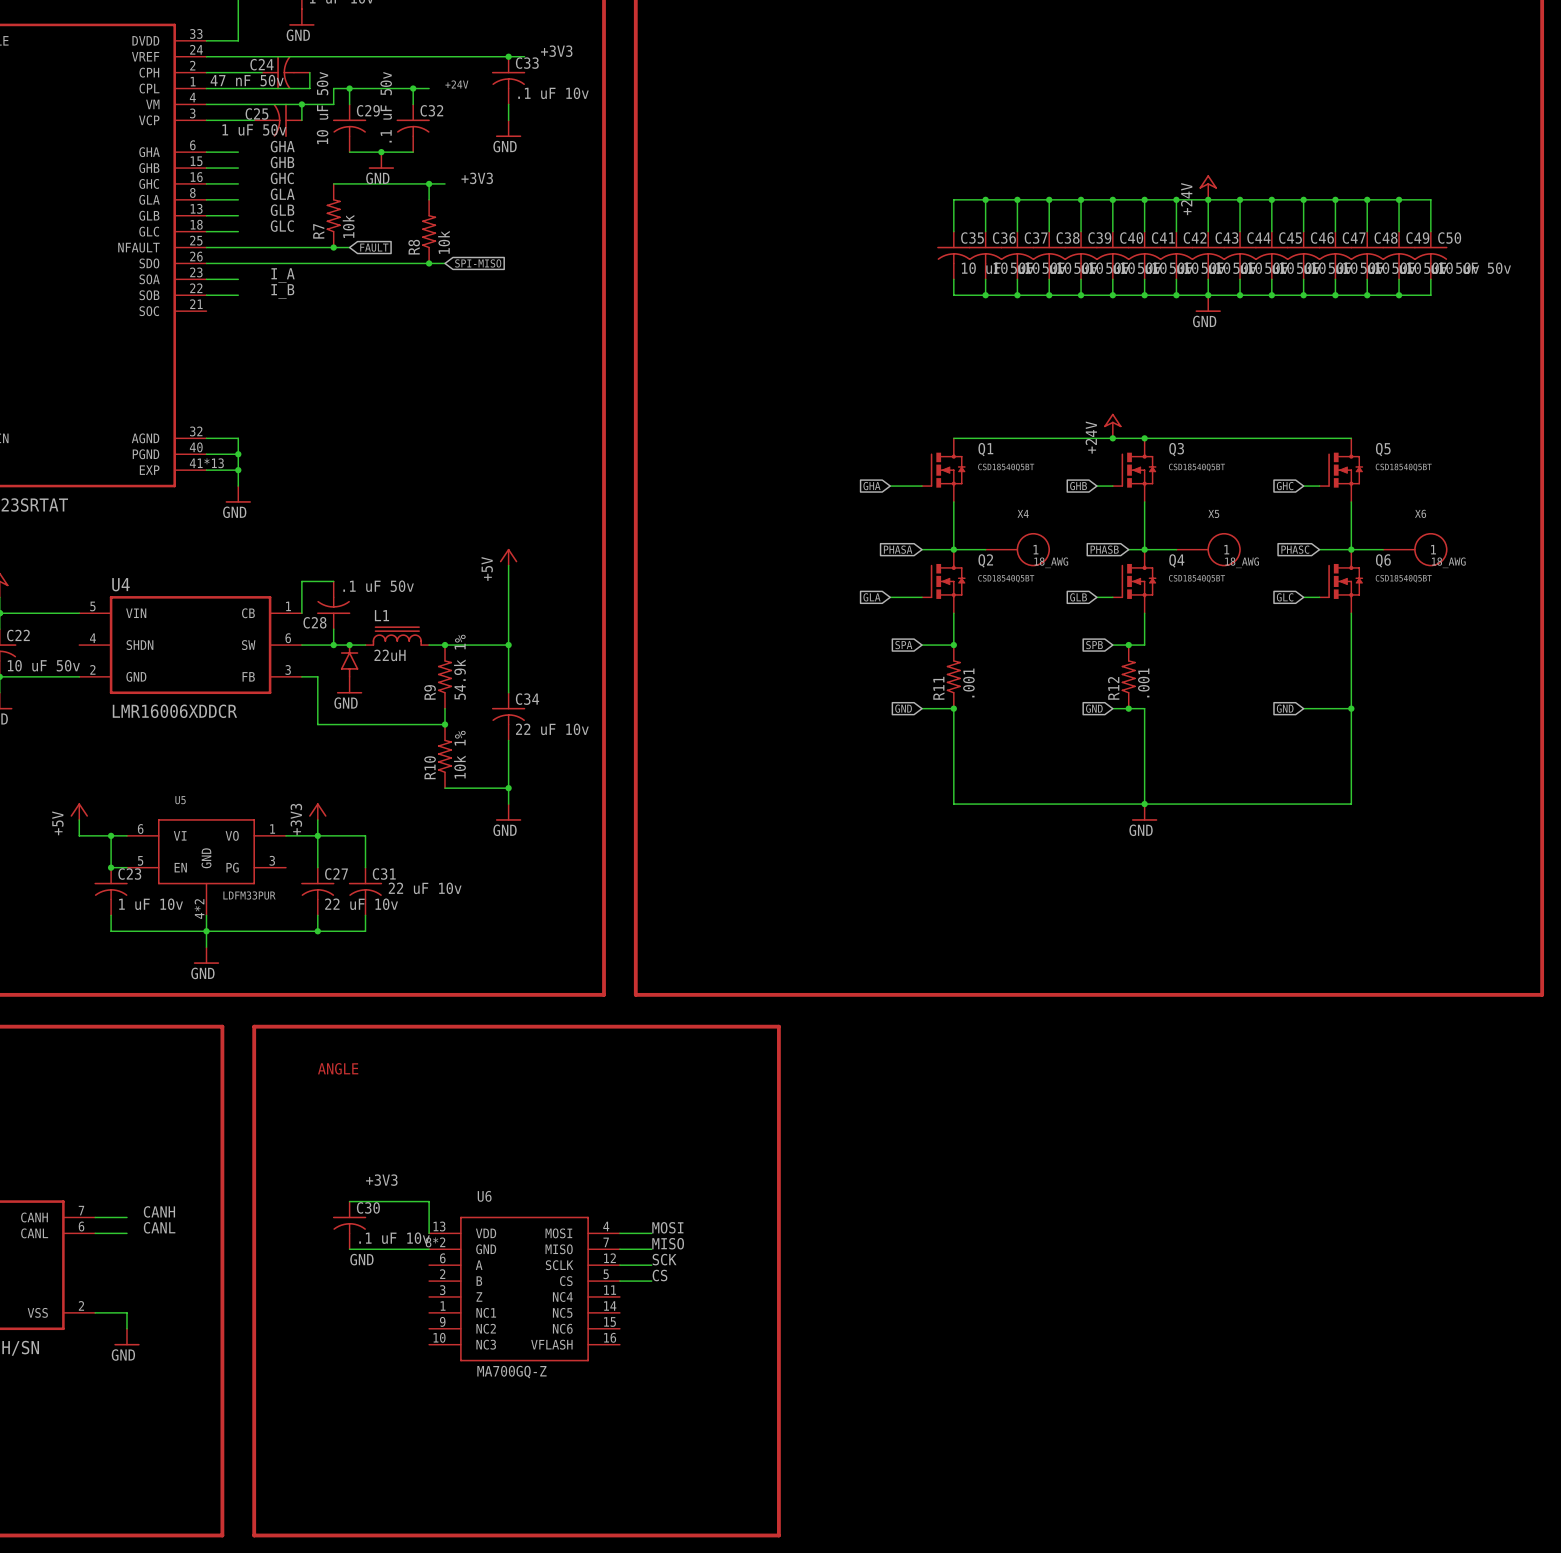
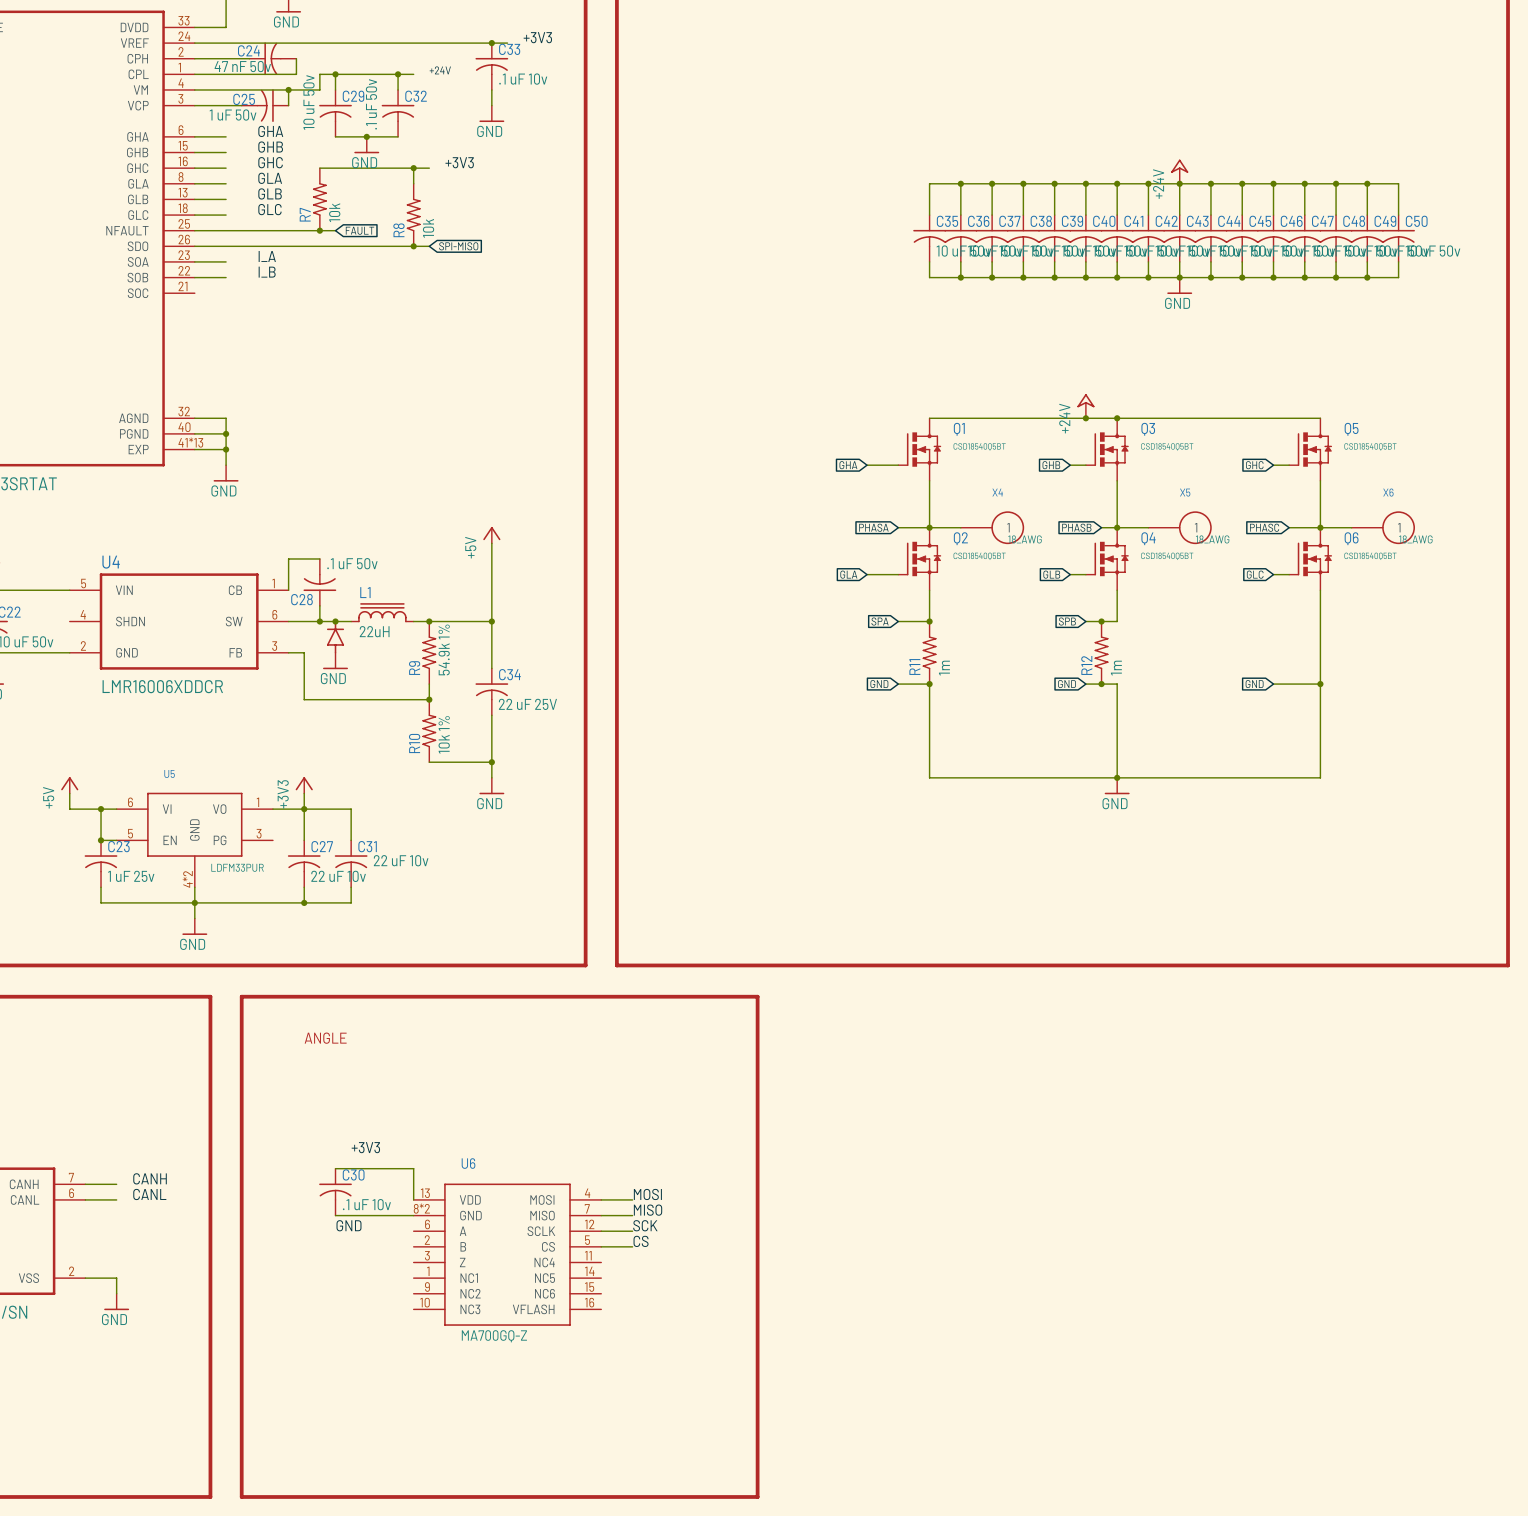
R11 value: .001 (968, 682) -> 1m (944, 668)
R12 value: .001 (1143, 682) -> 1m (1116, 668)
C34 value: 22 uF 10v (552, 729) -> 22 uF 25V (527, 704)
C23 value: 1 uF 10v (151, 904) -> 1 uF 25v (131, 876)

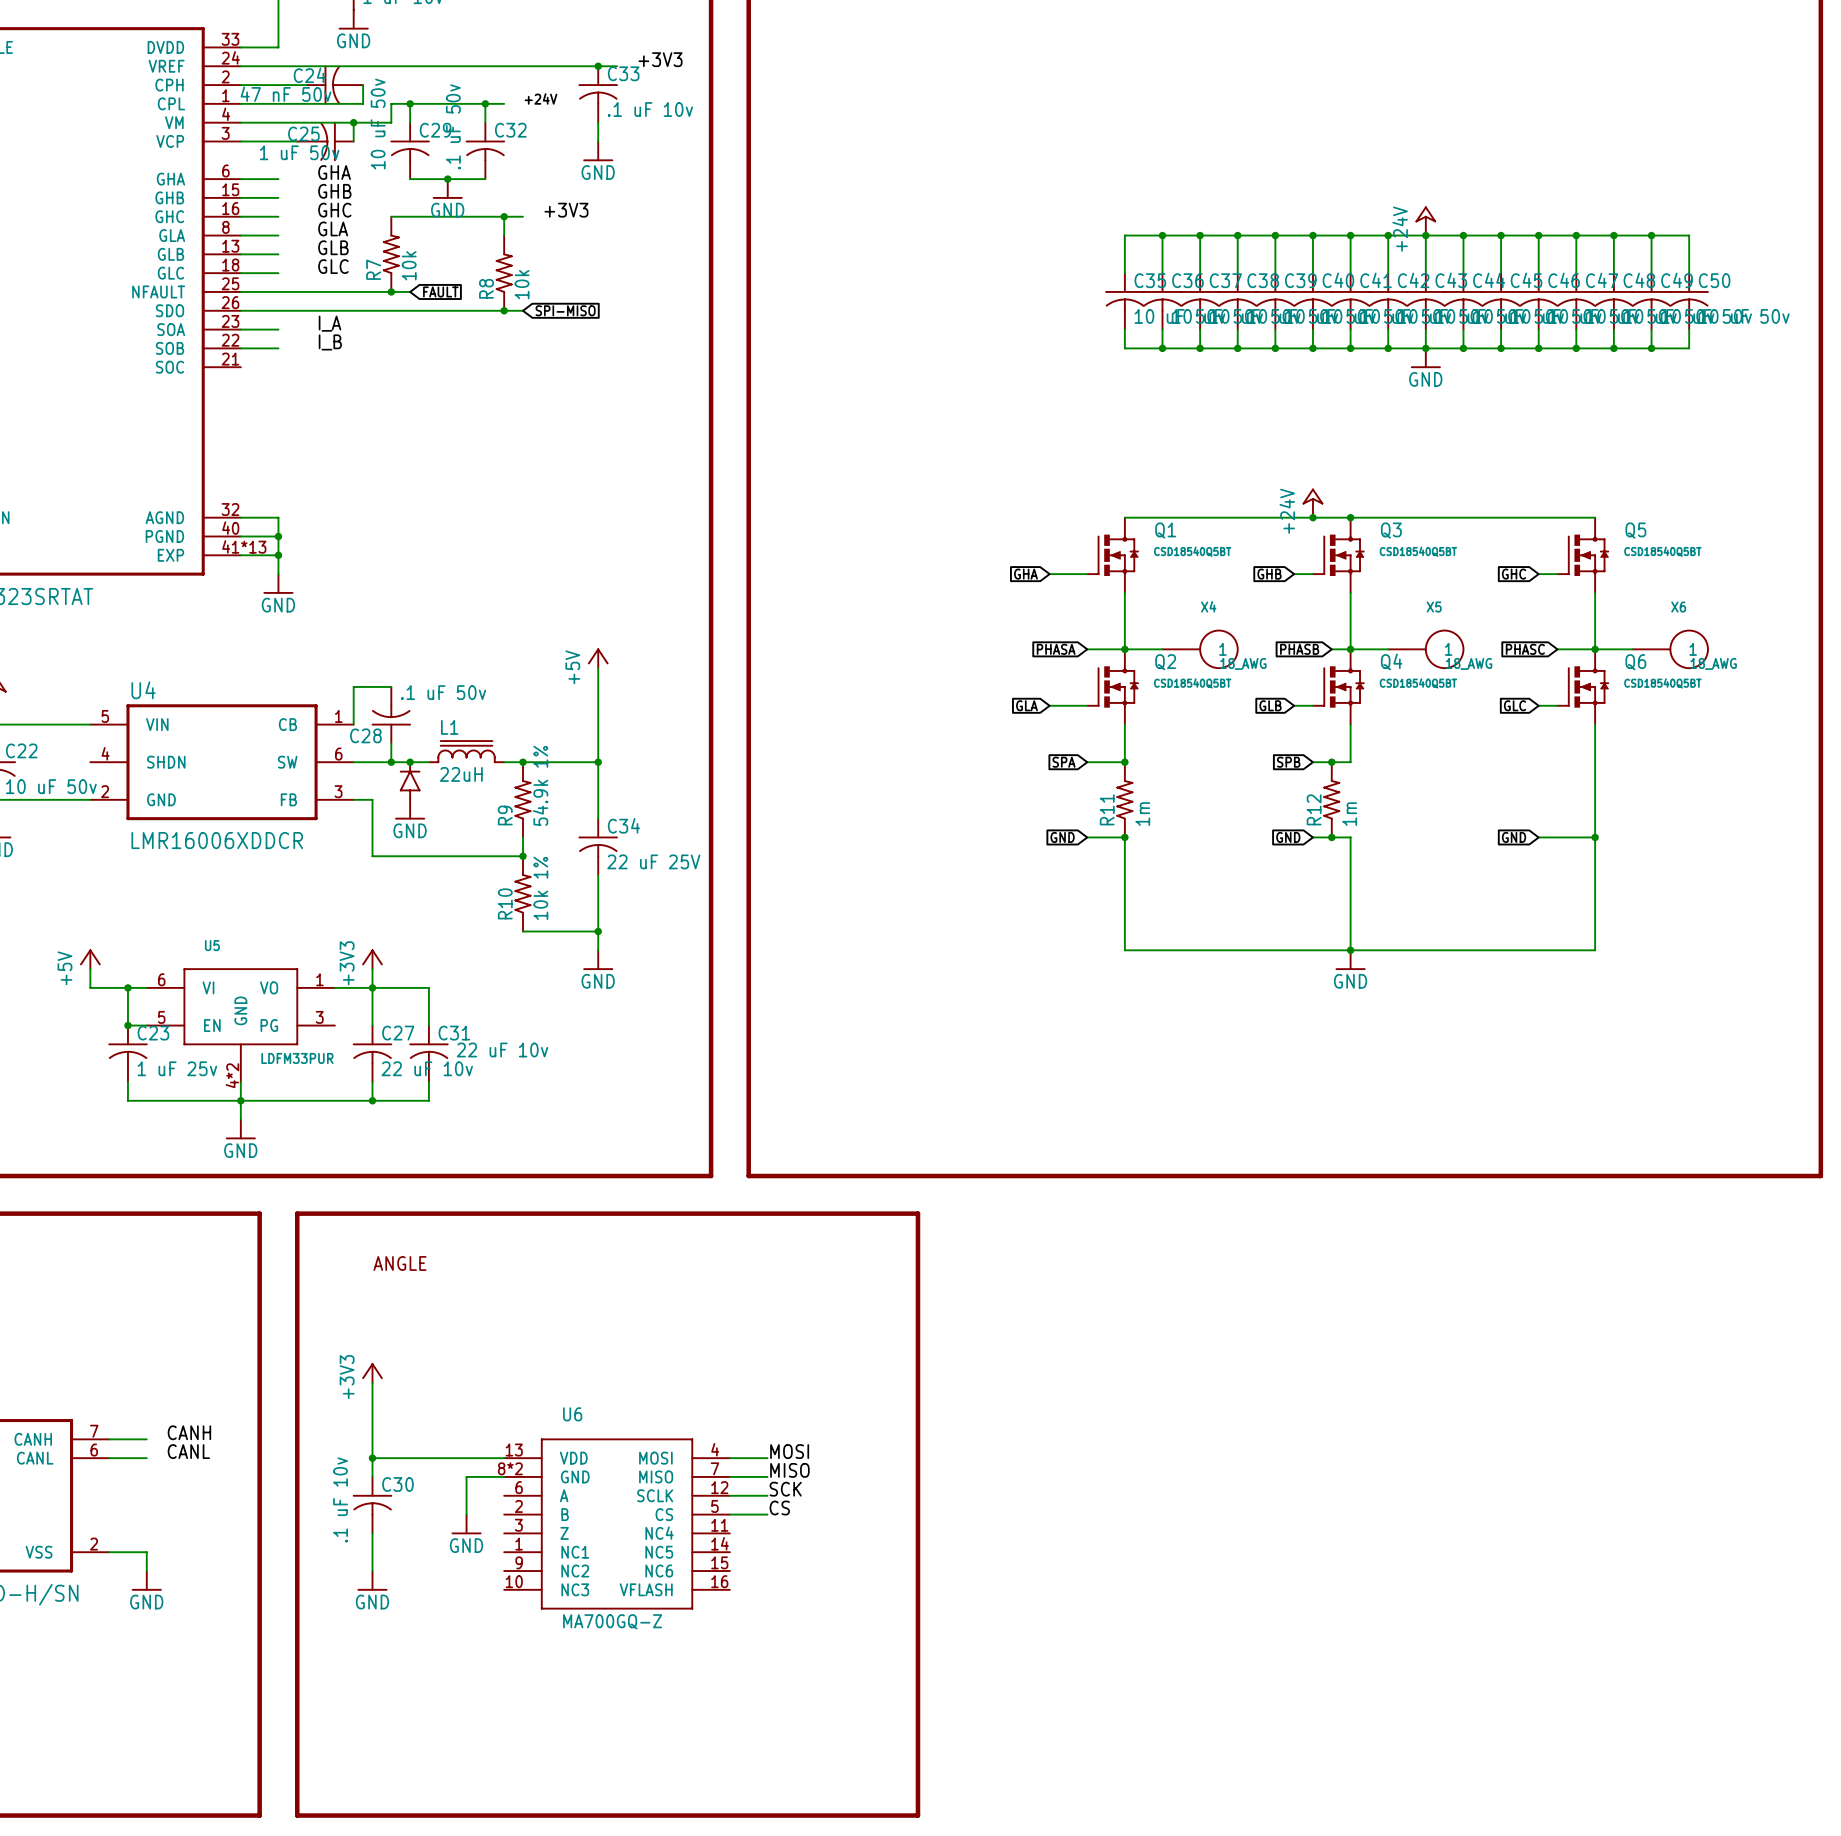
power symbol: none -> +3V3 (372, 1373)
wire: none -> (372, 1382) (372, 1476)
label: +3V3 (365, 1147) -> none
wire: (335, 1168) (413, 1168) (413, 1199) -> (372, 1458) (504, 1458)
C30 position: (335, 1192) -> (372, 1505)
junction: none -> (372, 1458)
C30 value rotation: 0° (366, 1204) -> 90° counterclockwise (340, 1499)
wire: (335, 1215) (382, 1215) -> (466, 1514) (466, 1476)
label: GND (348, 1225) -> none
power symbol: none -> GND (466, 1524)
wire: none -> (372, 1533) (372, 1571)
power symbol: none -> GND (372, 1580)

